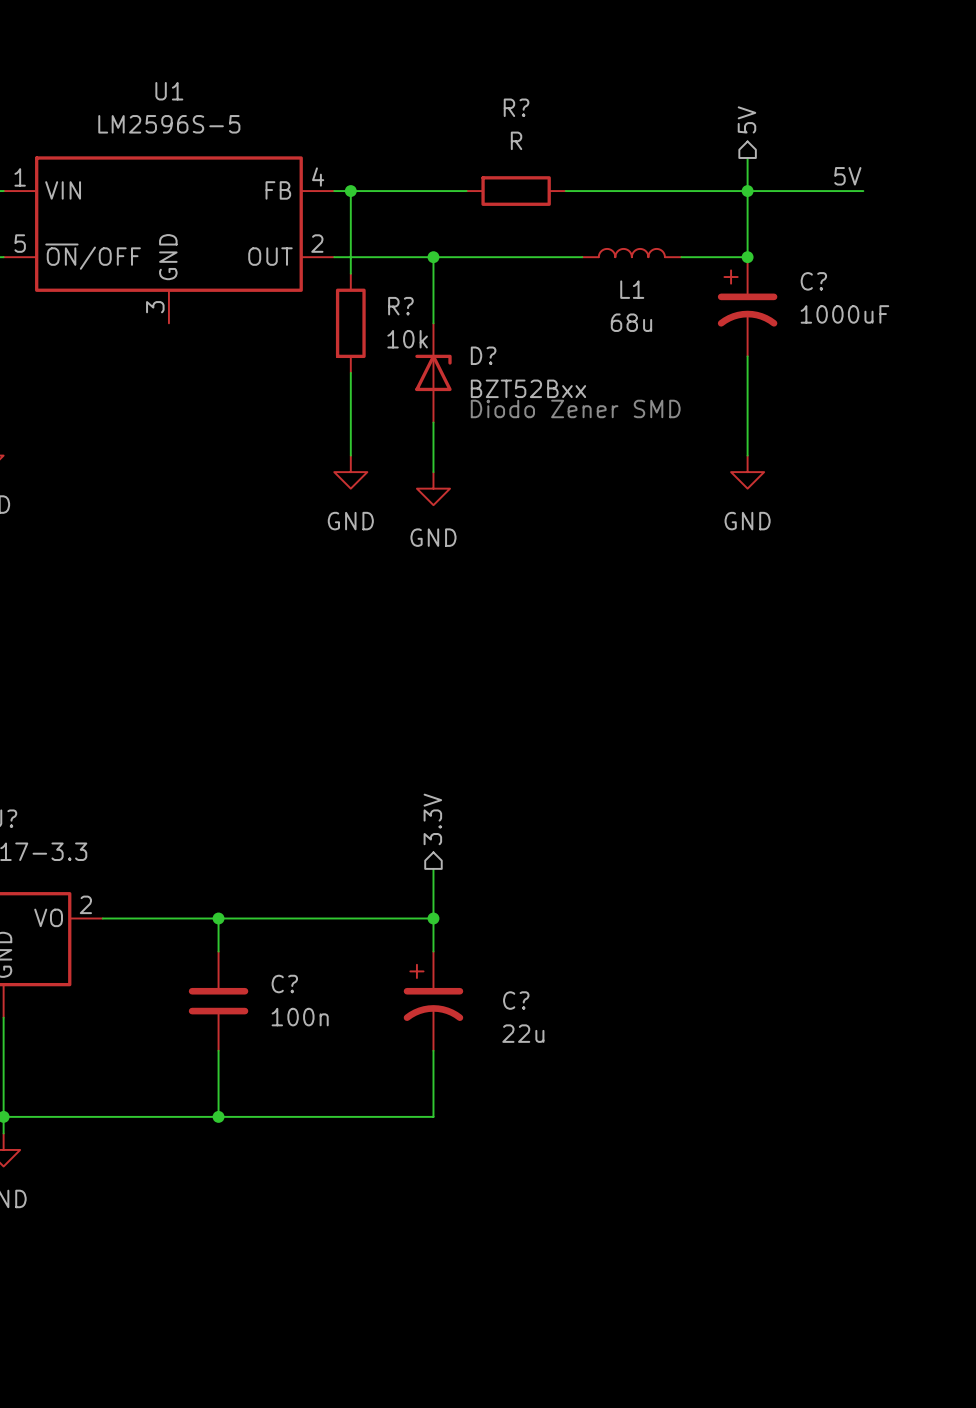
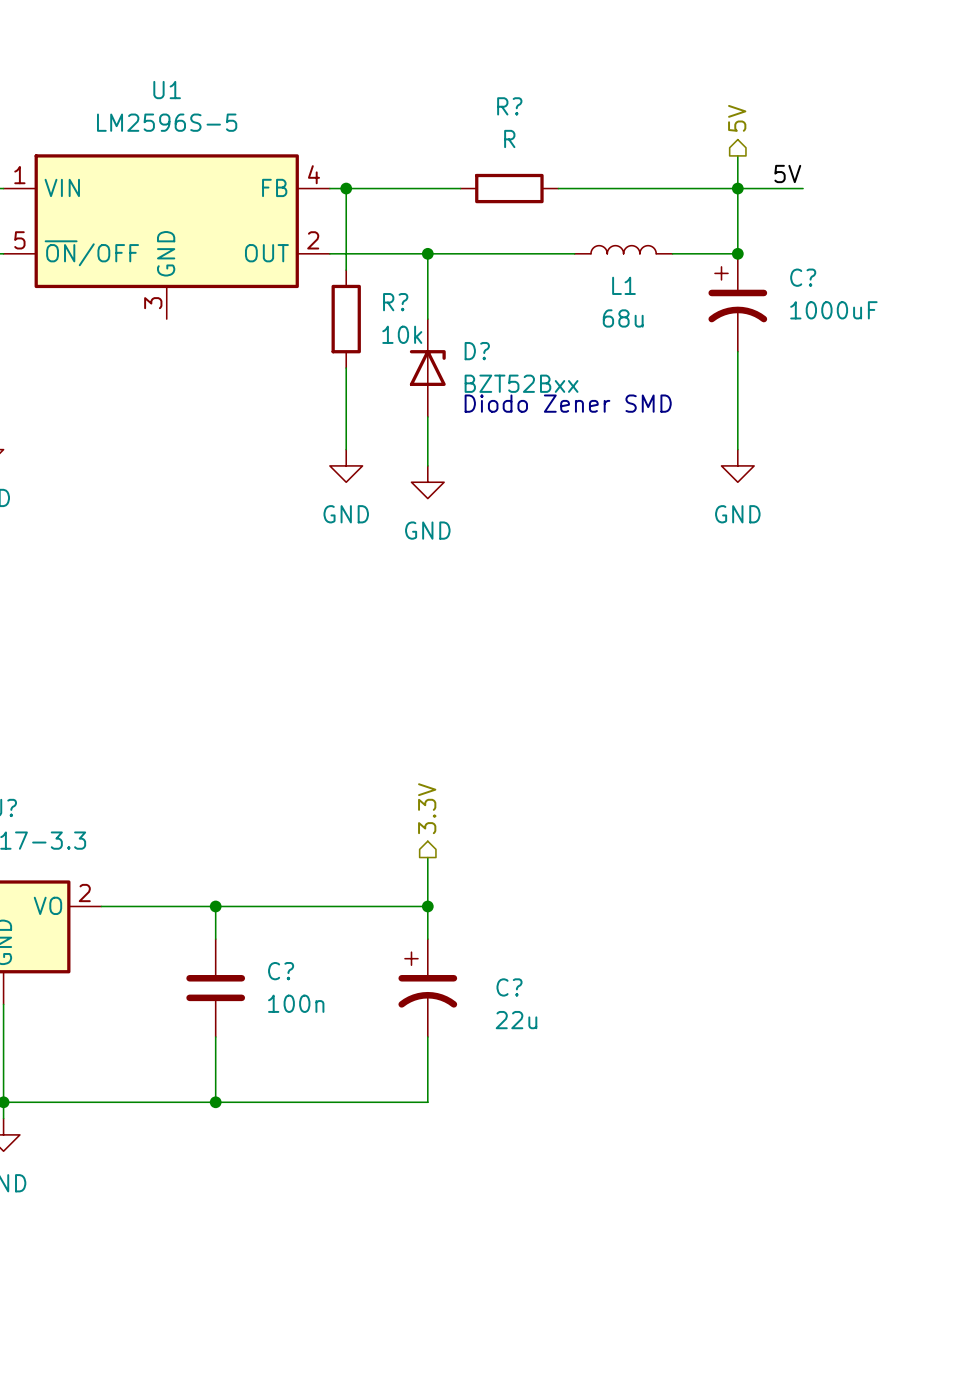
label position: 5V (847, 176) -> 5V (787, 173)
wire: (813, 191) (863, 191) -> none

